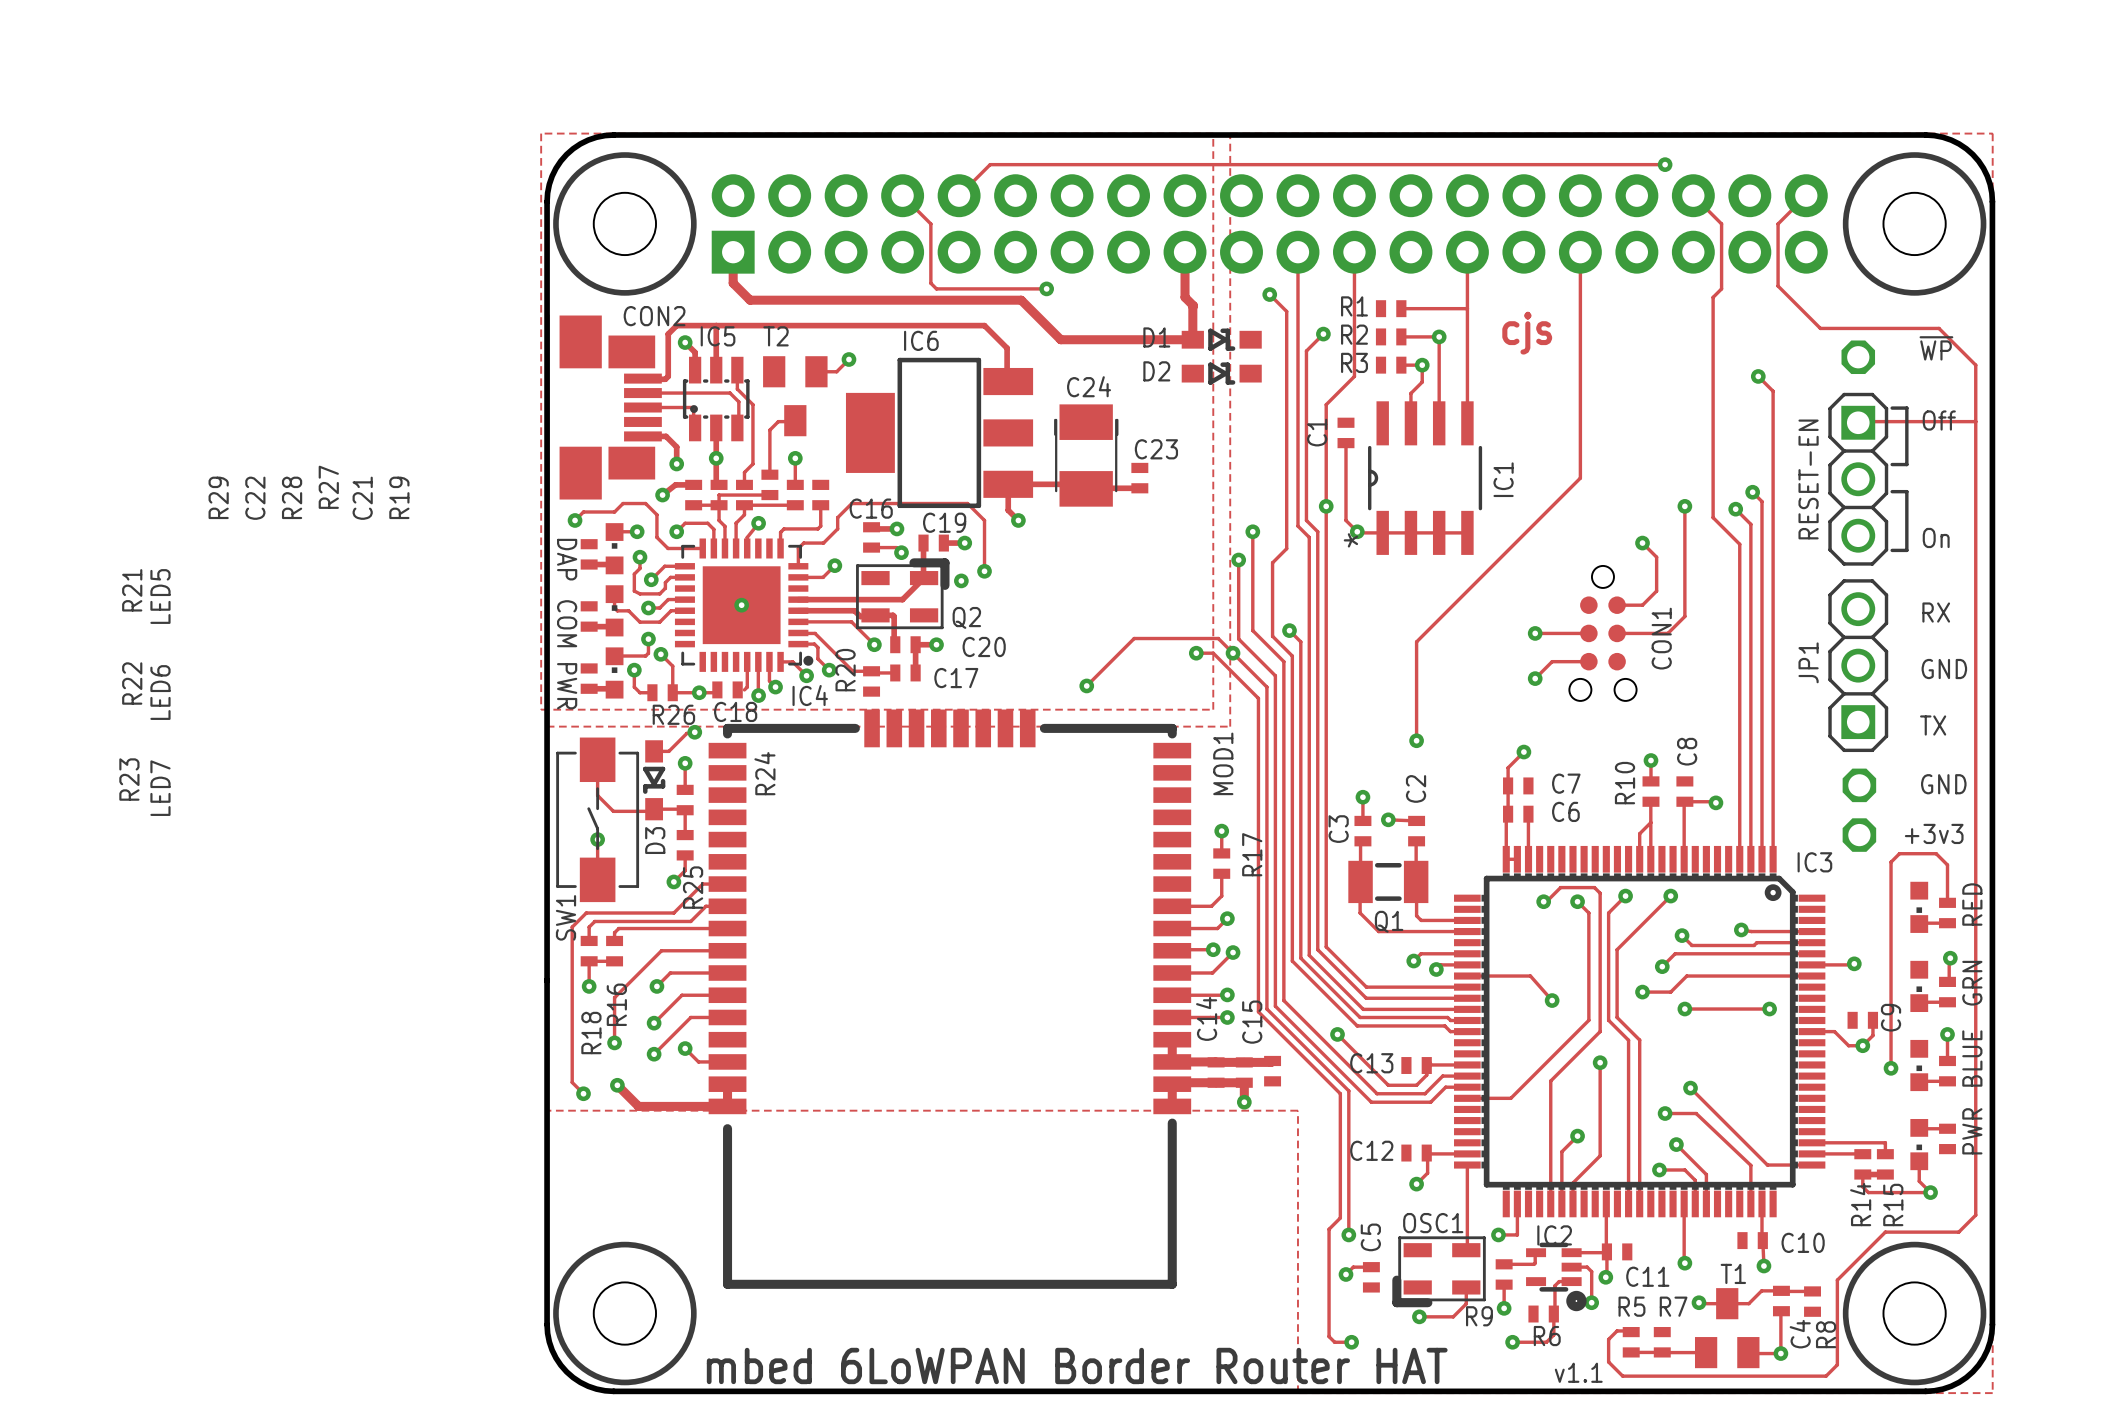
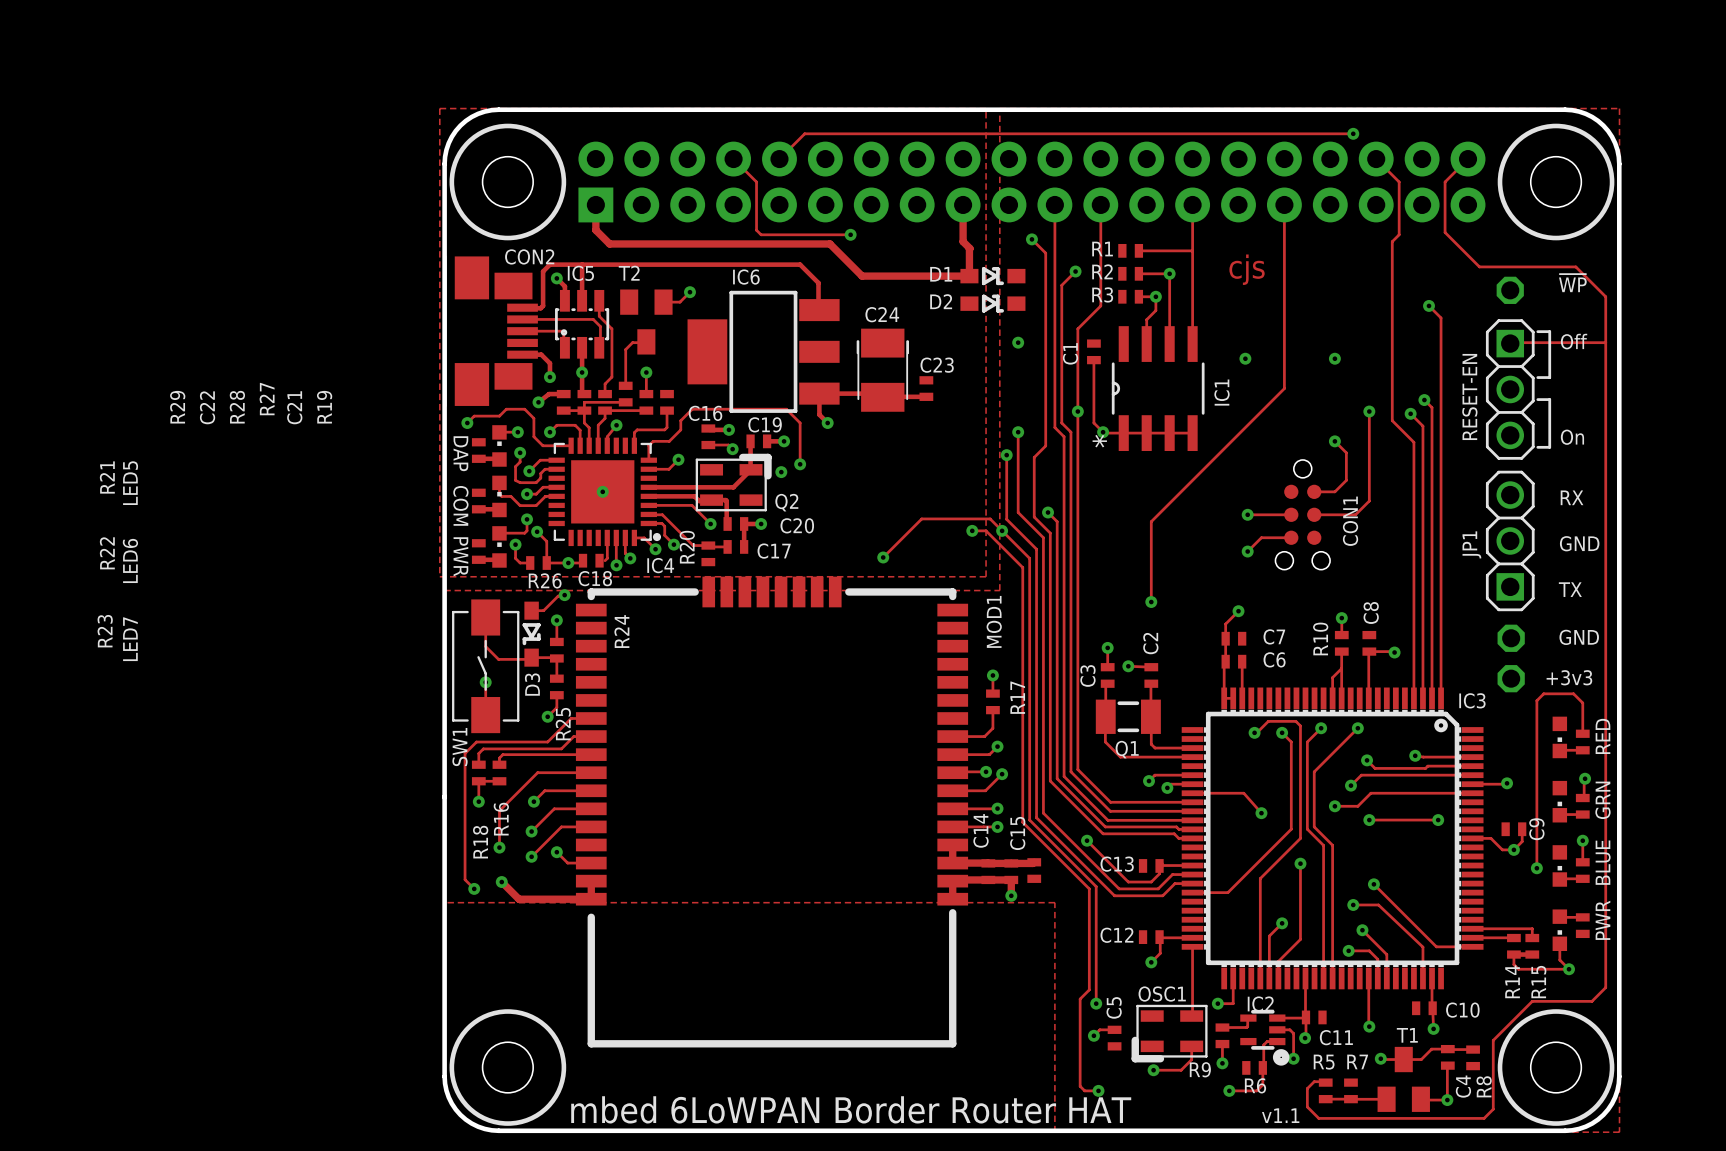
via: none -> (1018, 342)
via: none -> (1245, 358)
via: none -> (1334, 358)

